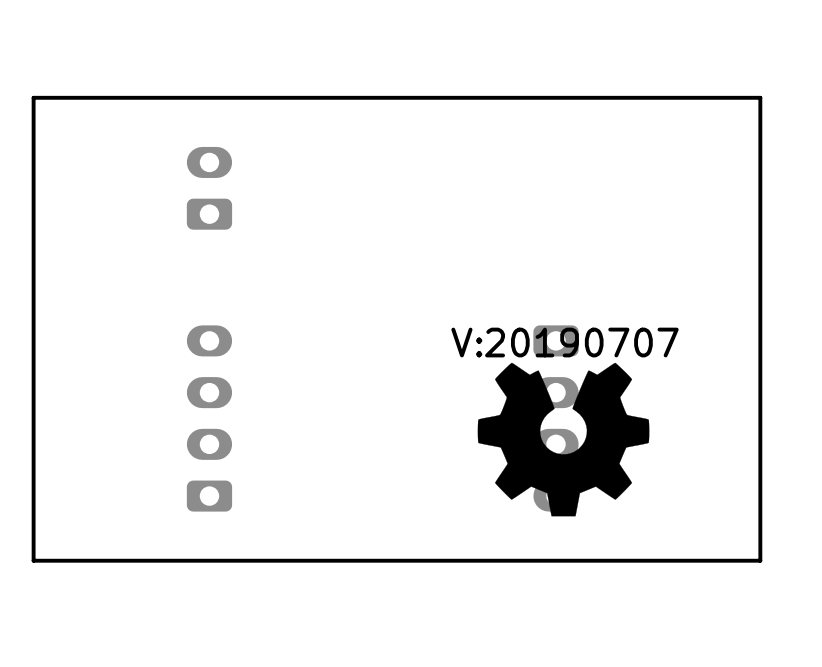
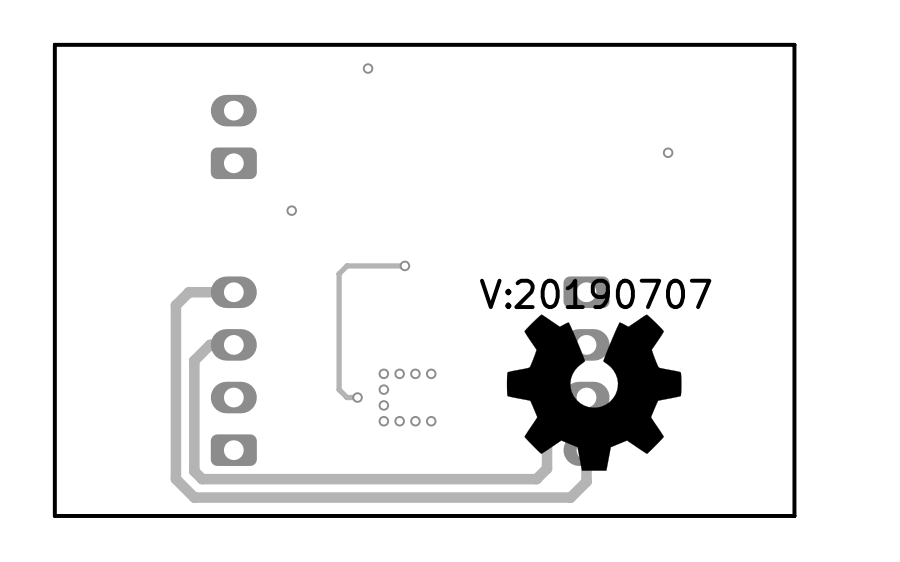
via: none -> (368, 68)
via: none -> (668, 152)
via: none -> (291, 210)
track: none -> (404, 265) (347, 265) (339, 273) (339, 389) (347, 397) (357, 397)
via: none -> (404, 265)
track: none -> (233, 292) (189, 292) (175, 305) (175, 479) (194, 497) (570, 497) (586, 481) (586, 450)
track: none -> (233, 344) (210, 344) (194, 360) (194, 471) (202, 479) (536, 479) (547, 468) (547, 405) (554, 397) (586, 397)
via: none -> (383, 373)
via: none -> (399, 373)
via: none -> (415, 373)
via: none -> (431, 373)
via: none -> (383, 389)
via: none -> (357, 397)
via: none -> (383, 405)
via: none -> (383, 421)
via: none -> (399, 421)
via: none -> (415, 421)
via: none -> (431, 421)

